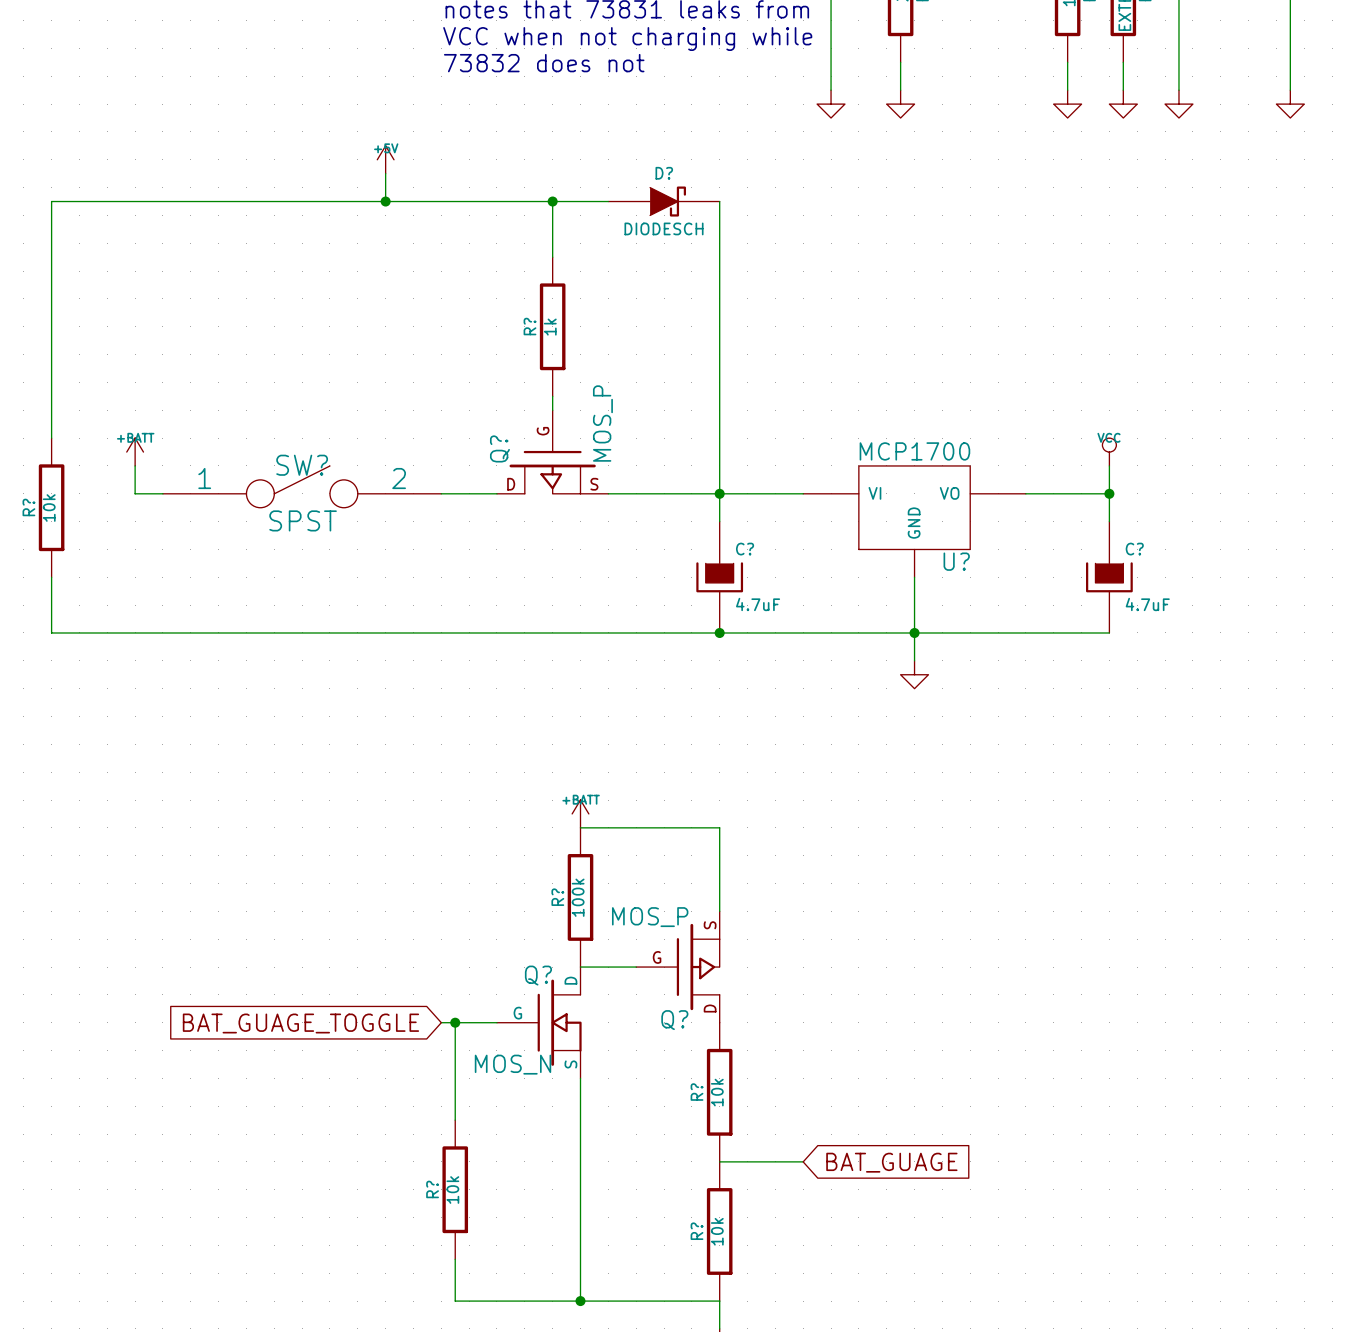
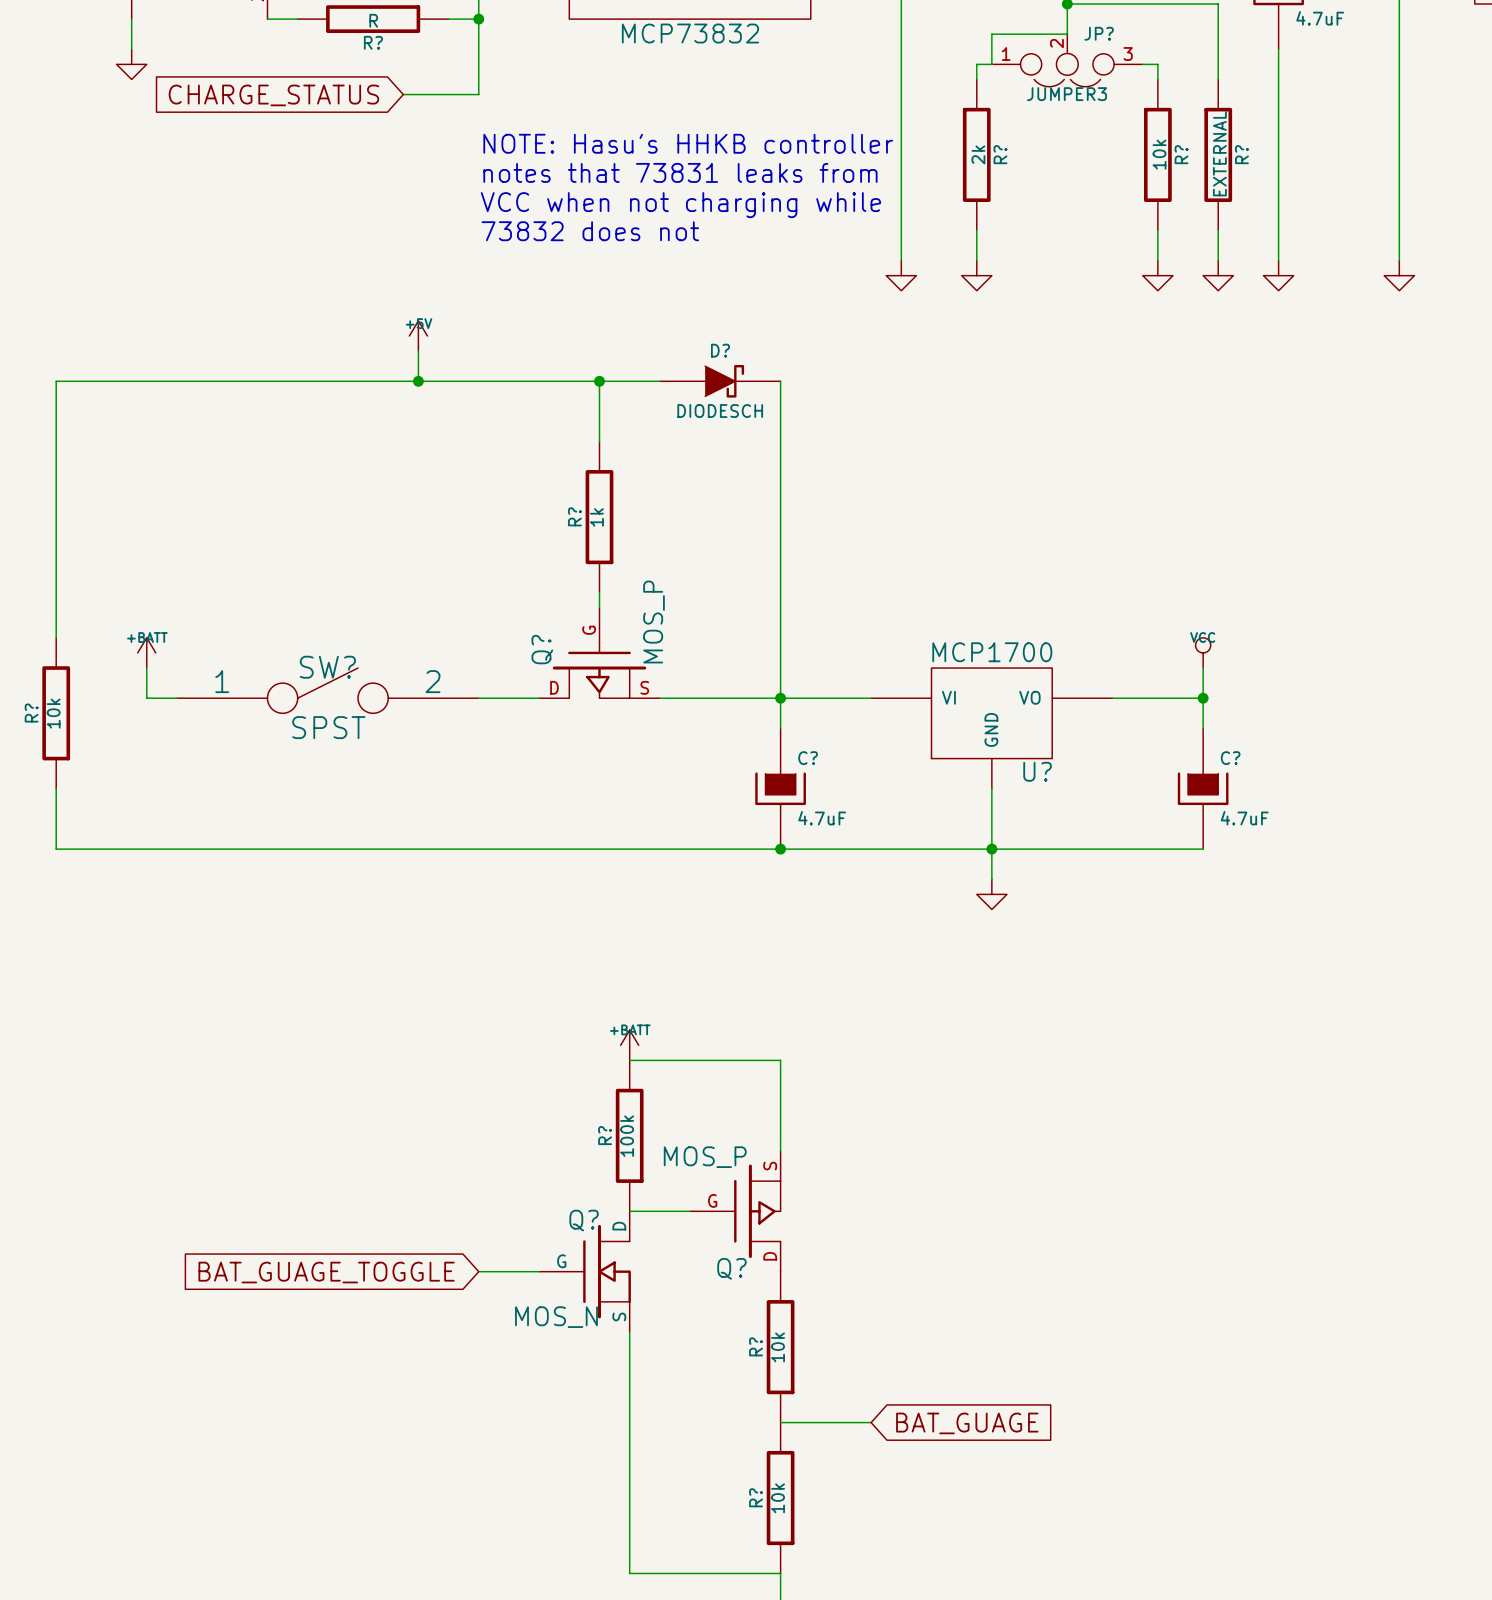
wire: (455, 1022) (455, 1120) -> none
junction: (455, 1022) -> none
R?: 10k (455, 1189) -> none
wire: (455, 1259) (455, 1301) (580, 1301) -> none
junction: (580, 1301) -> none

